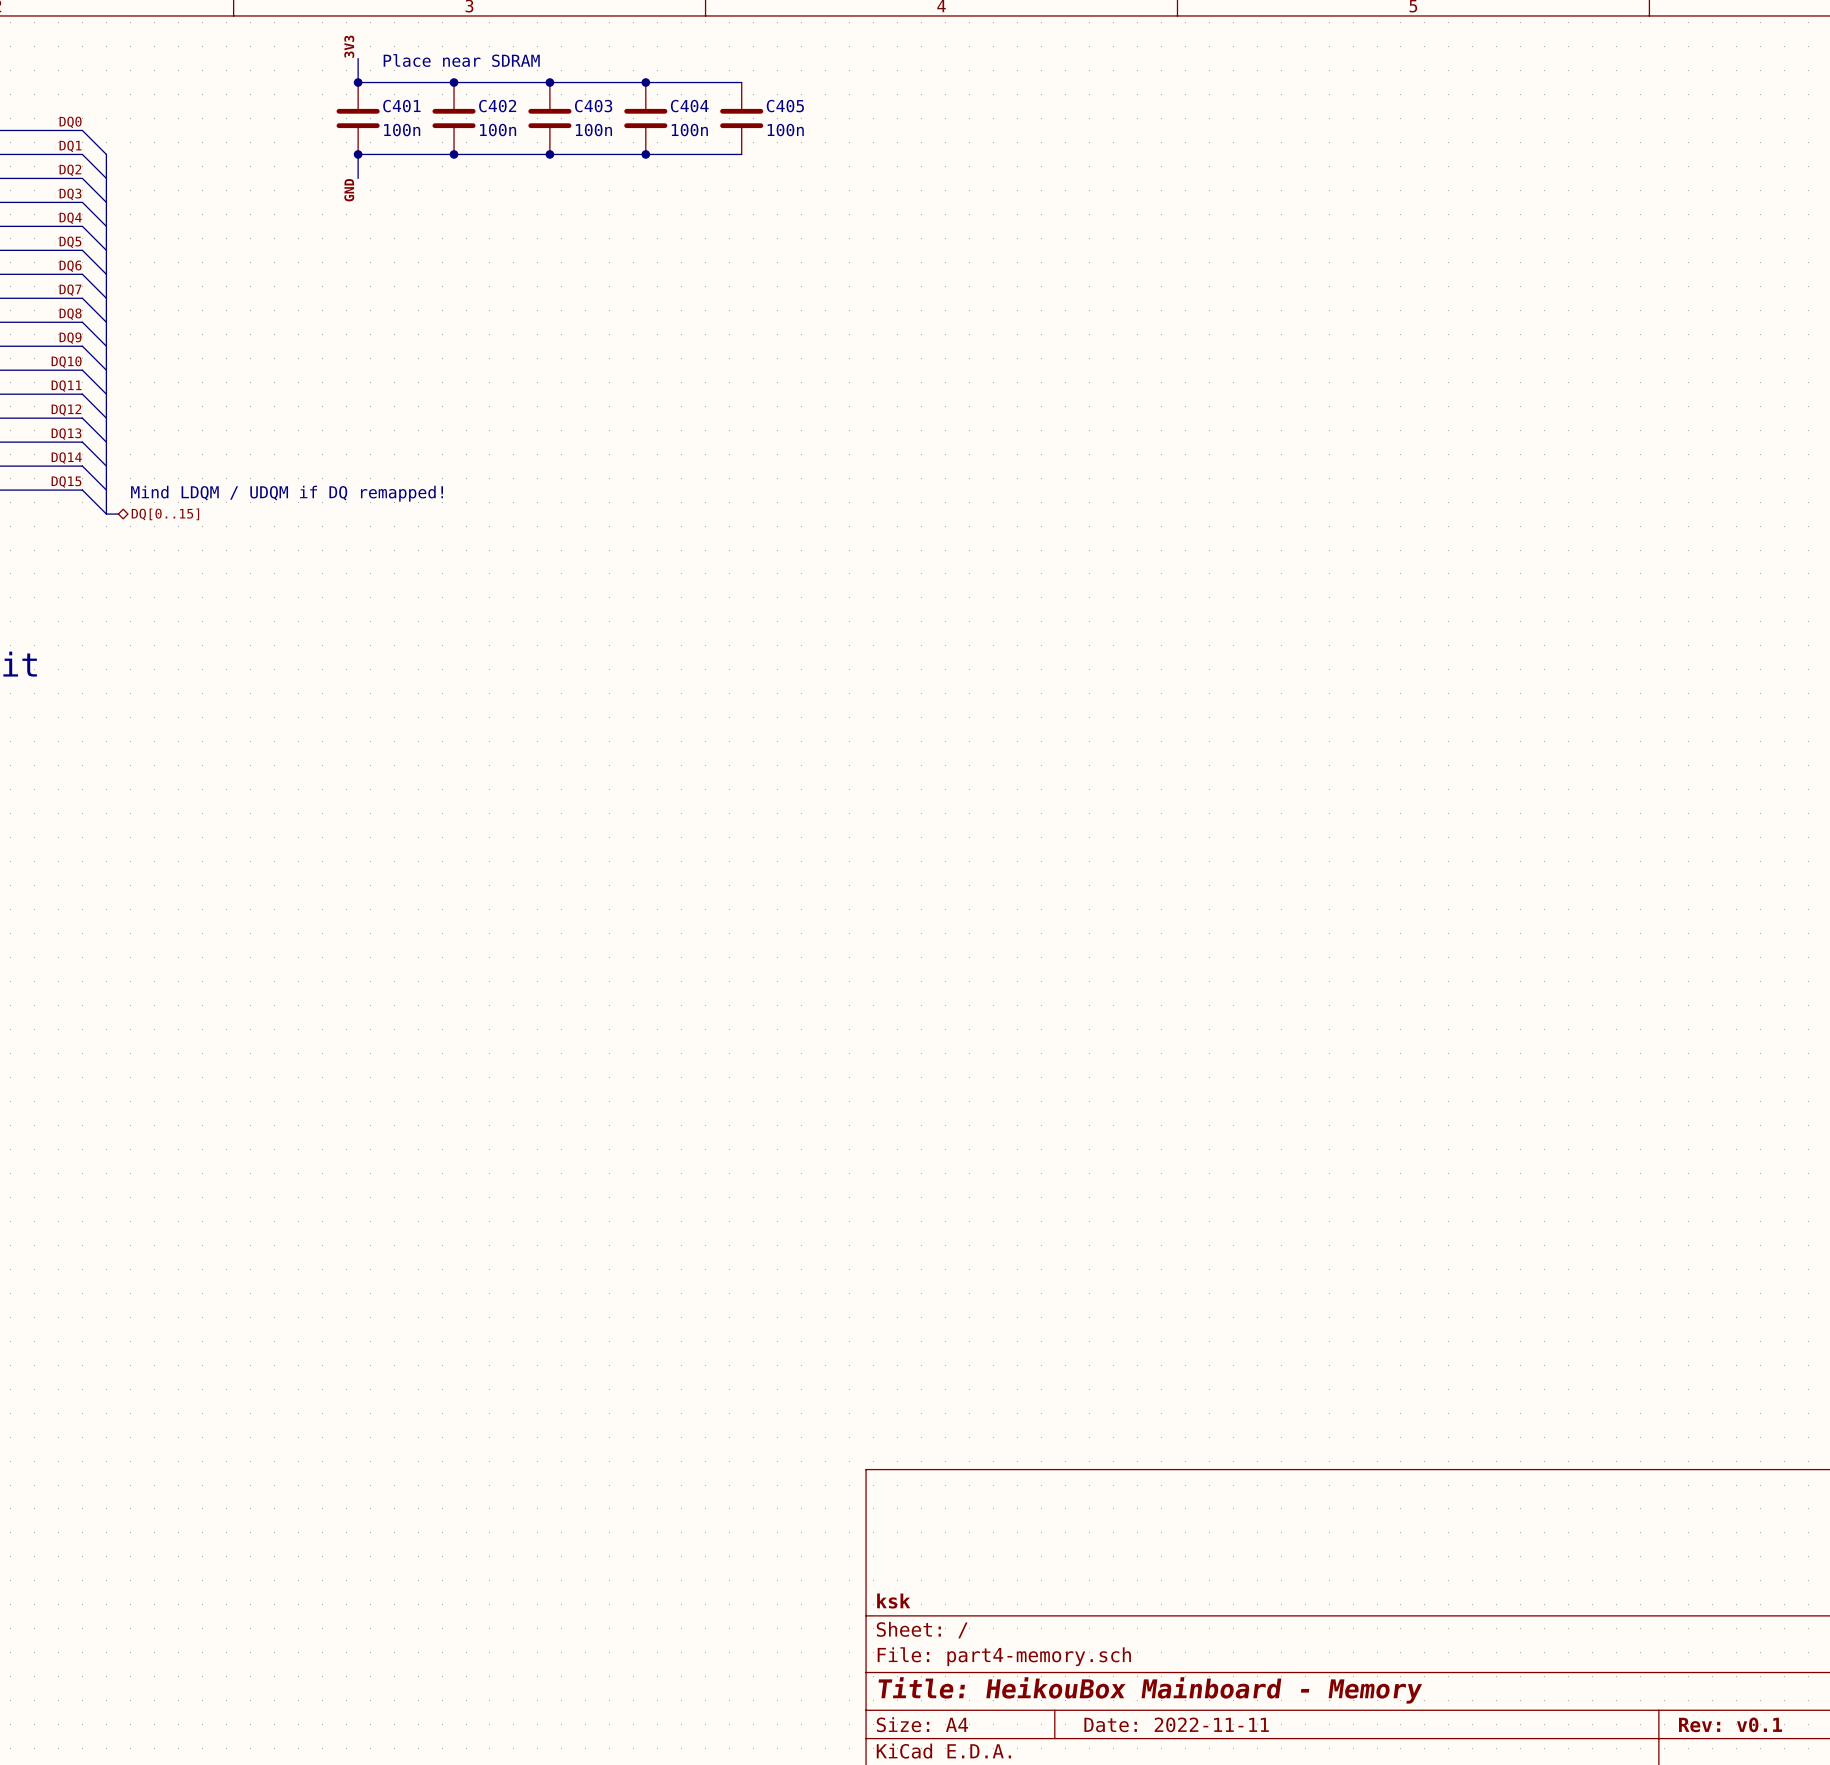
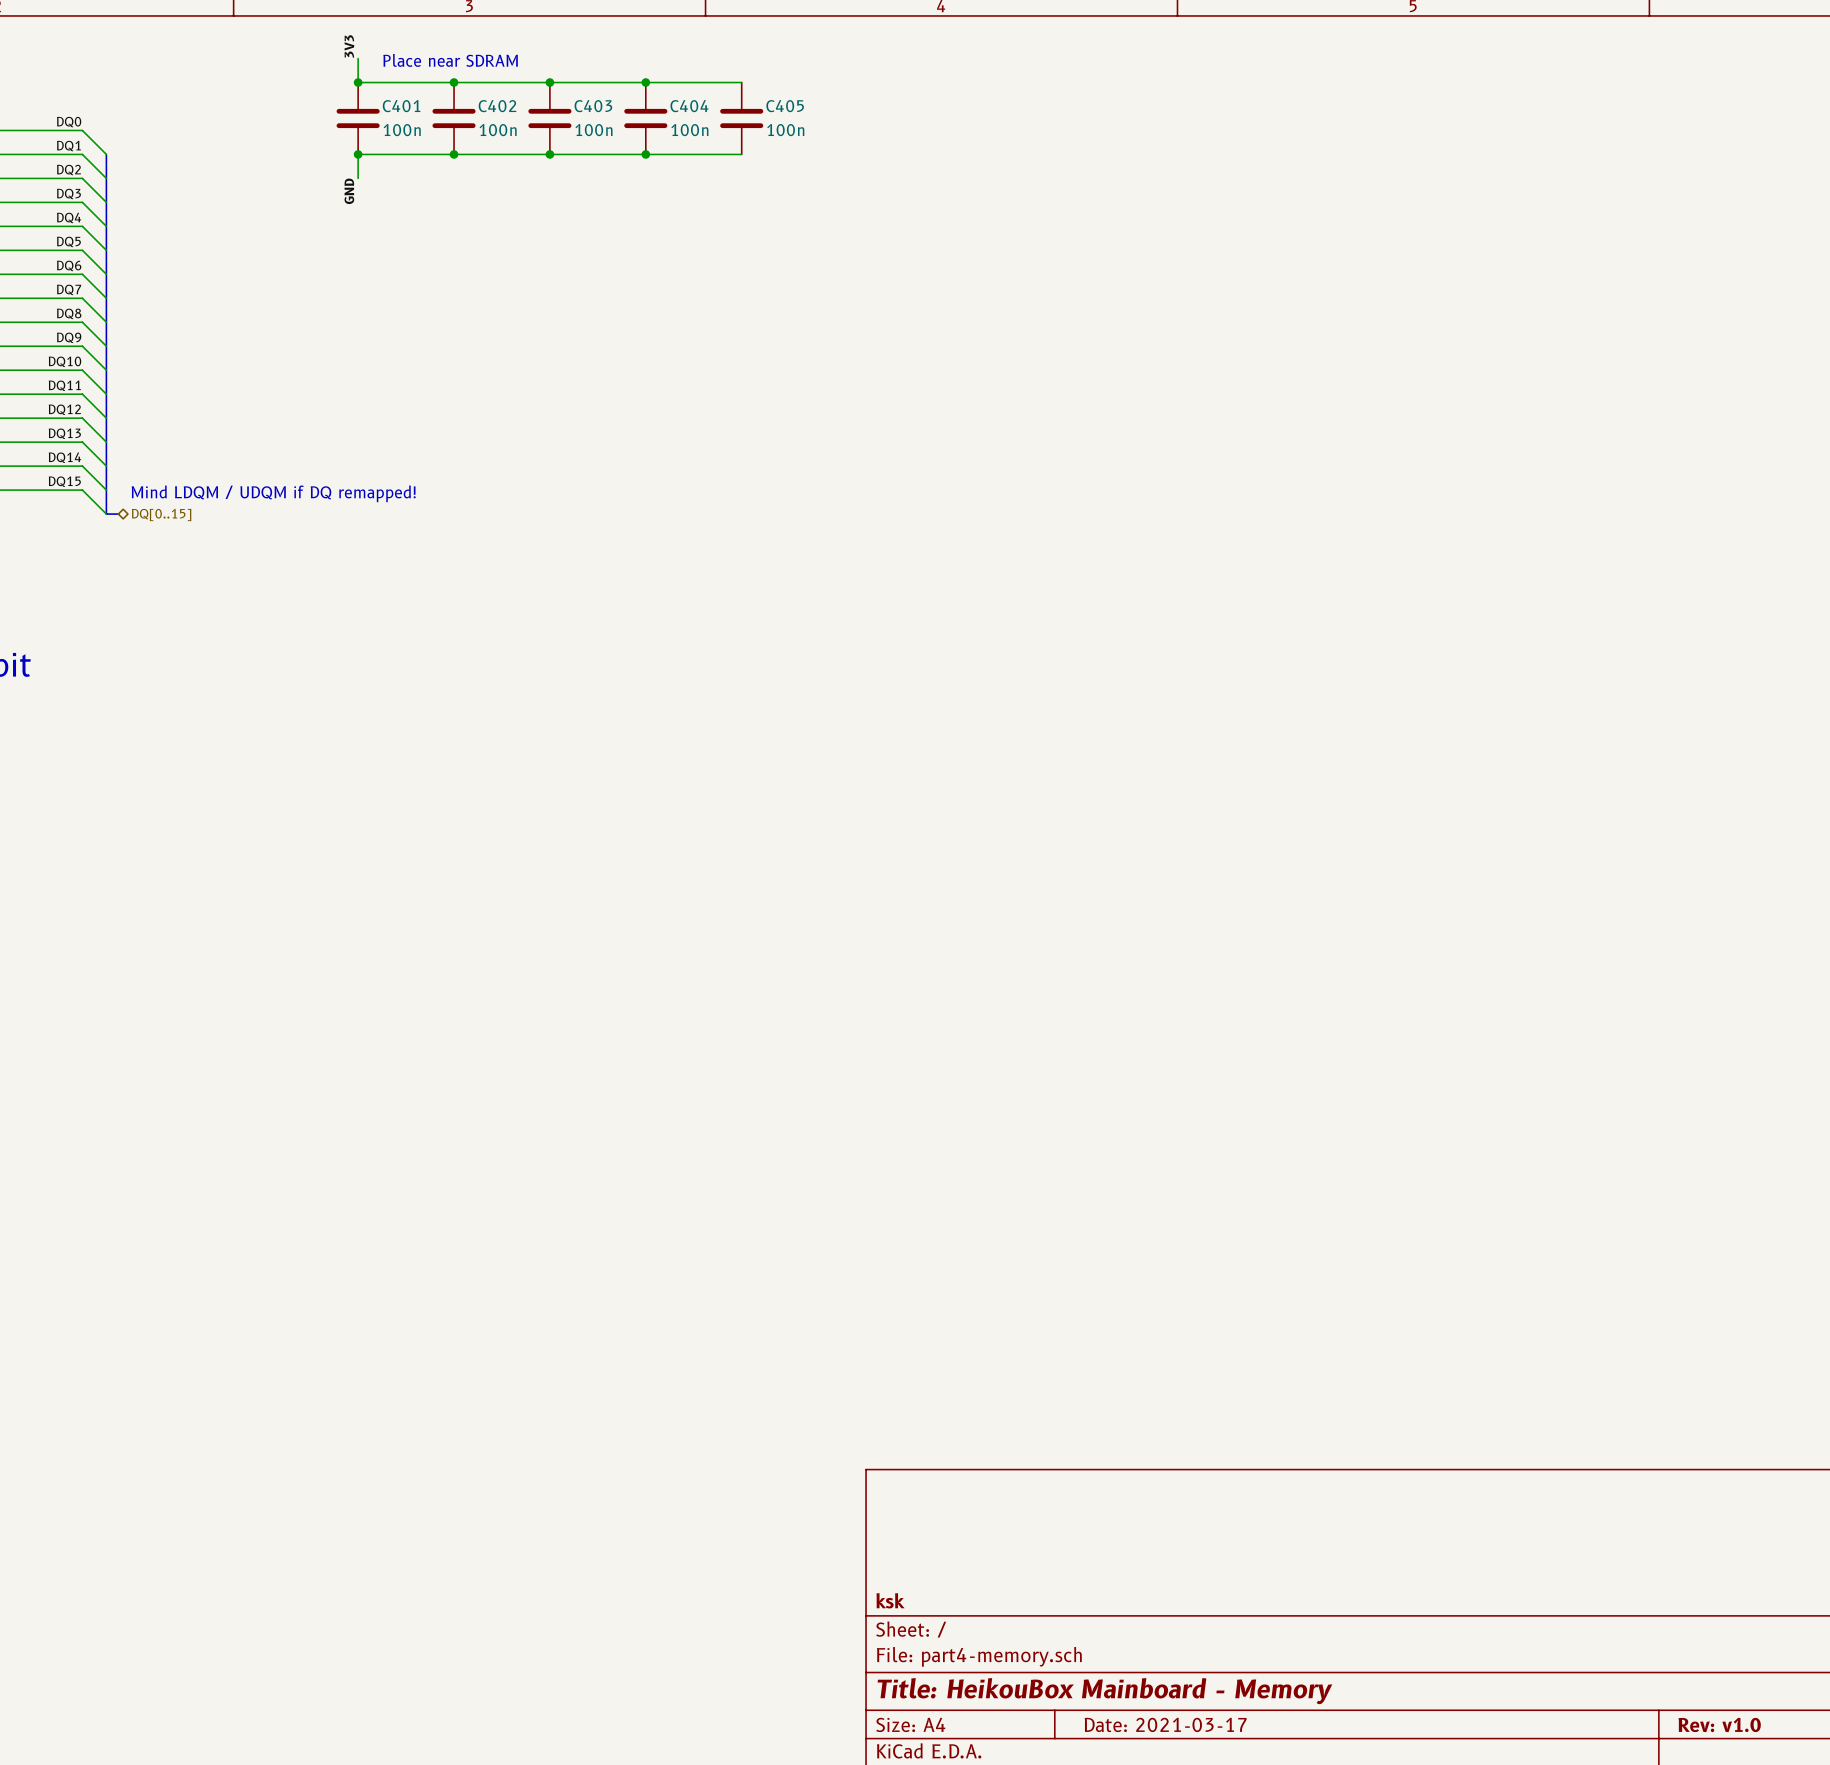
title block: Date: 2022-11-11 (1176, 1724) -> Date: 2021-03-17 (1165, 1724)
title block: Rev: v0.1 (1730, 1724) -> Rev: v1.0 (1719, 1724)

